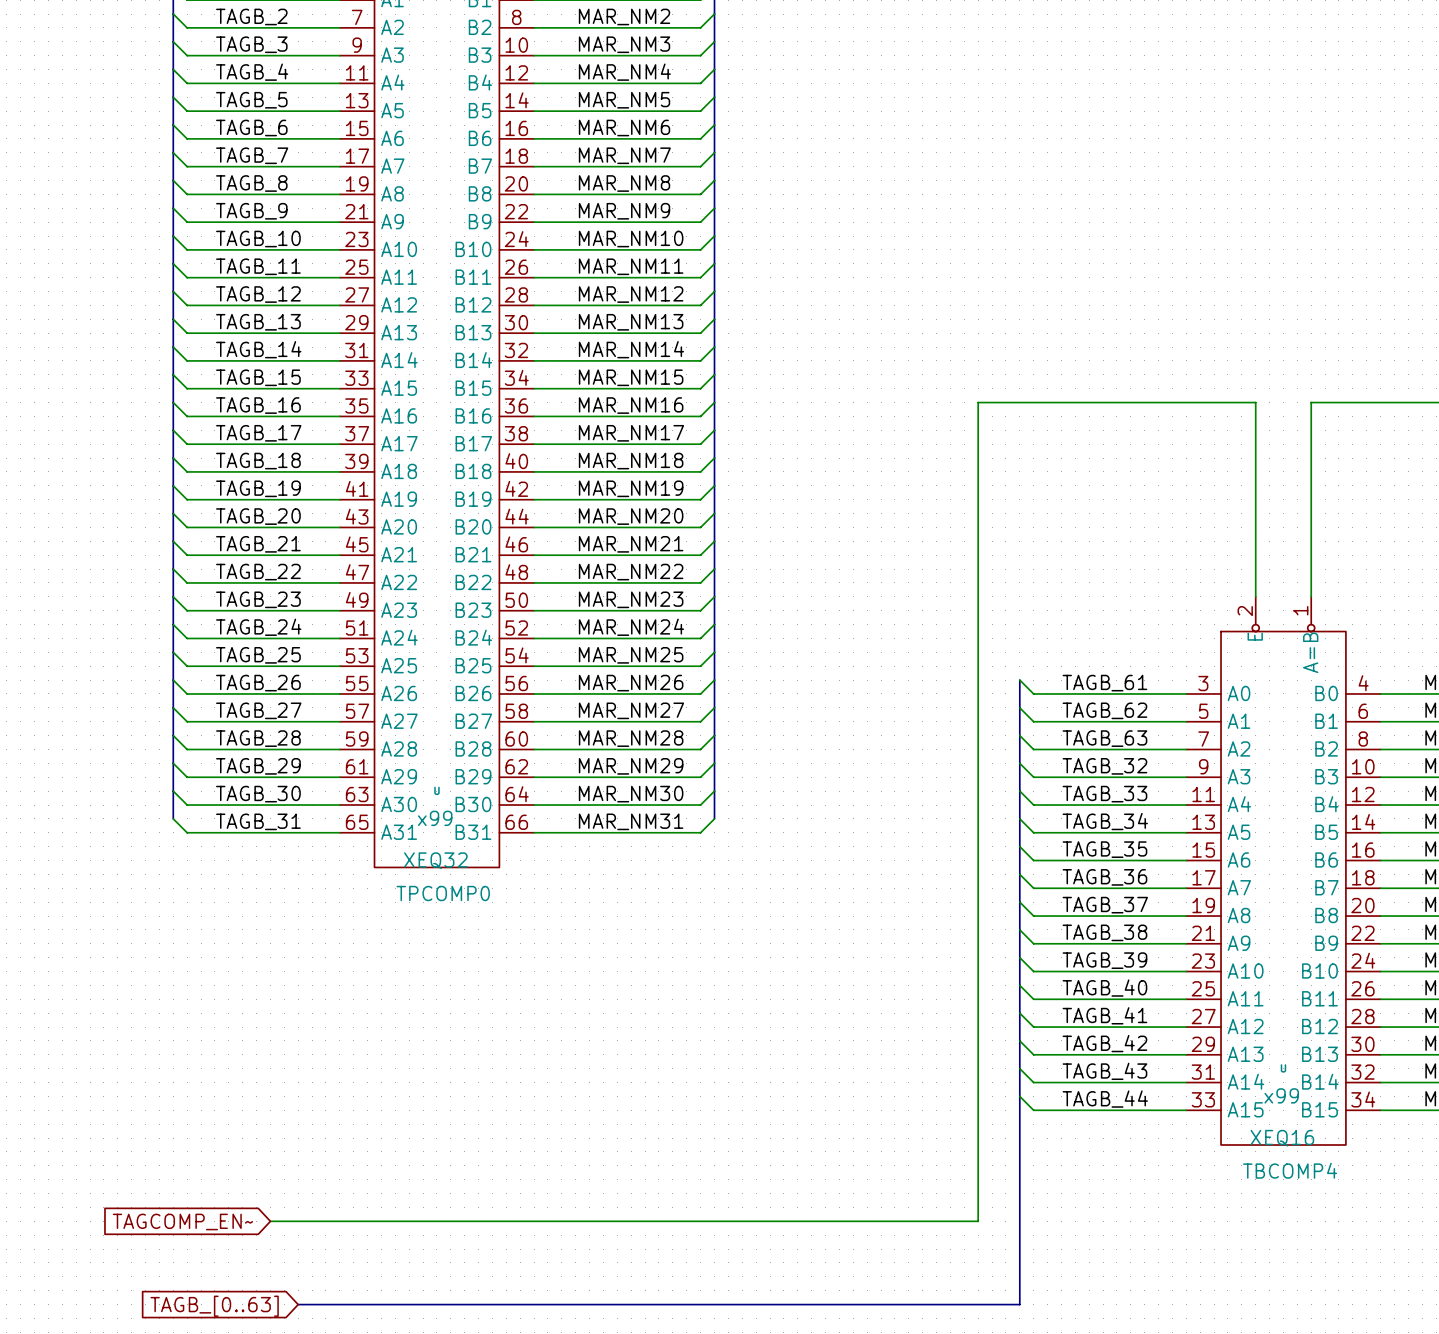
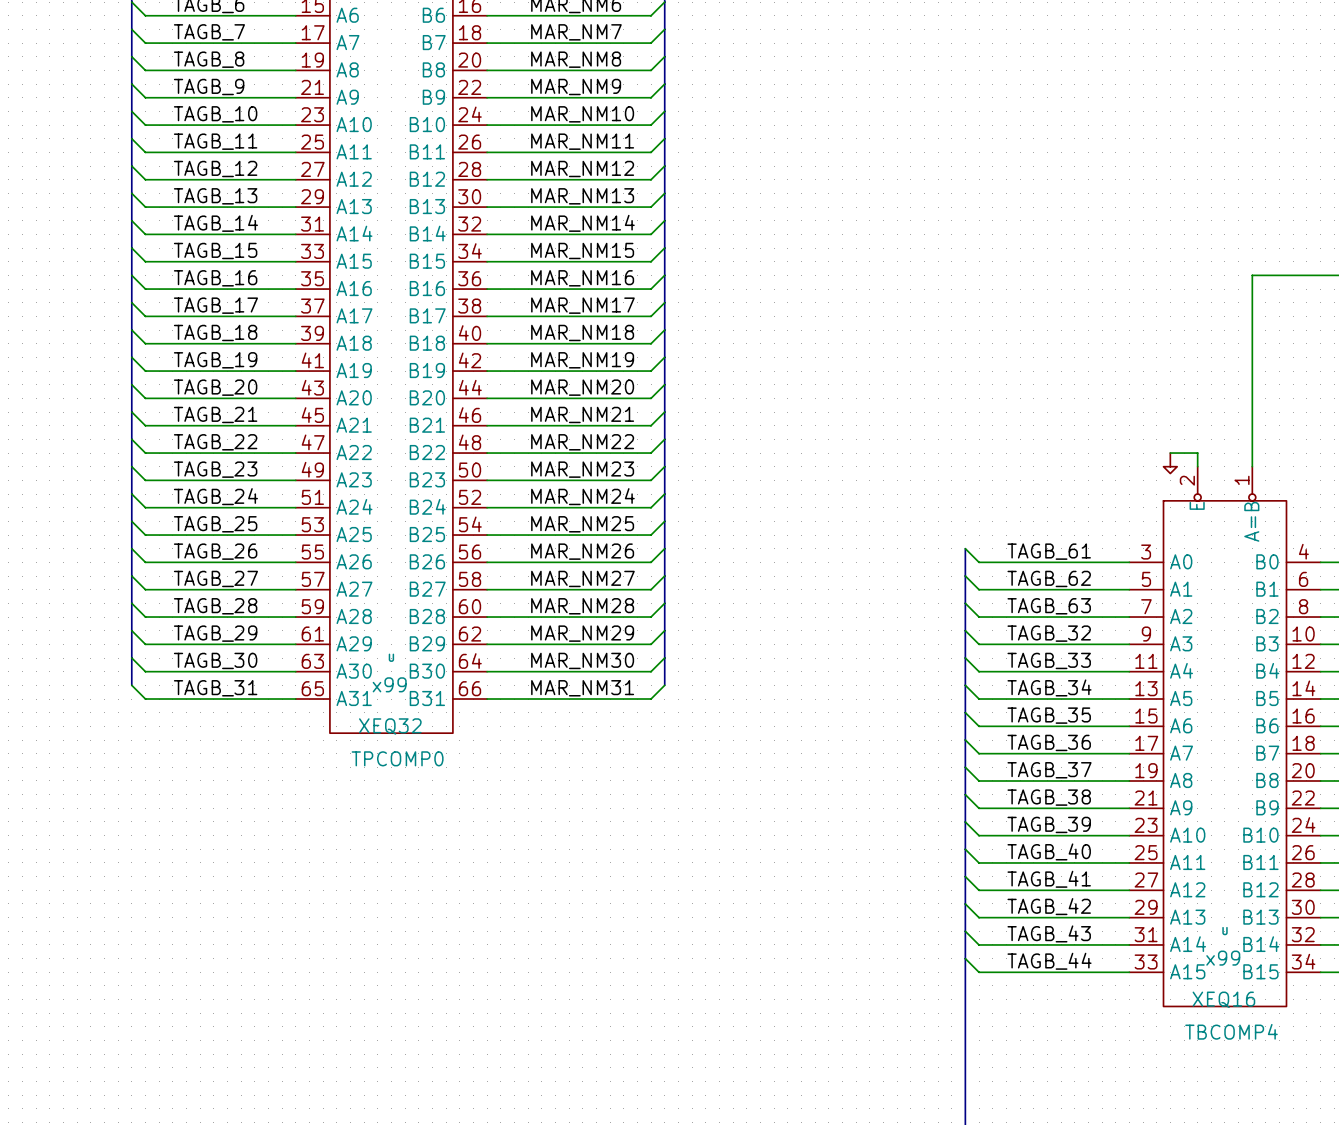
wire: (1255, 582) (1255, 402) (978, 402) (978, 1221) (270, 1221) -> (1197, 453) (1170, 453)
power symbol: none -> (1170, 463)
global label: TAGCOMP_EN~ (182, 1221) -> none

